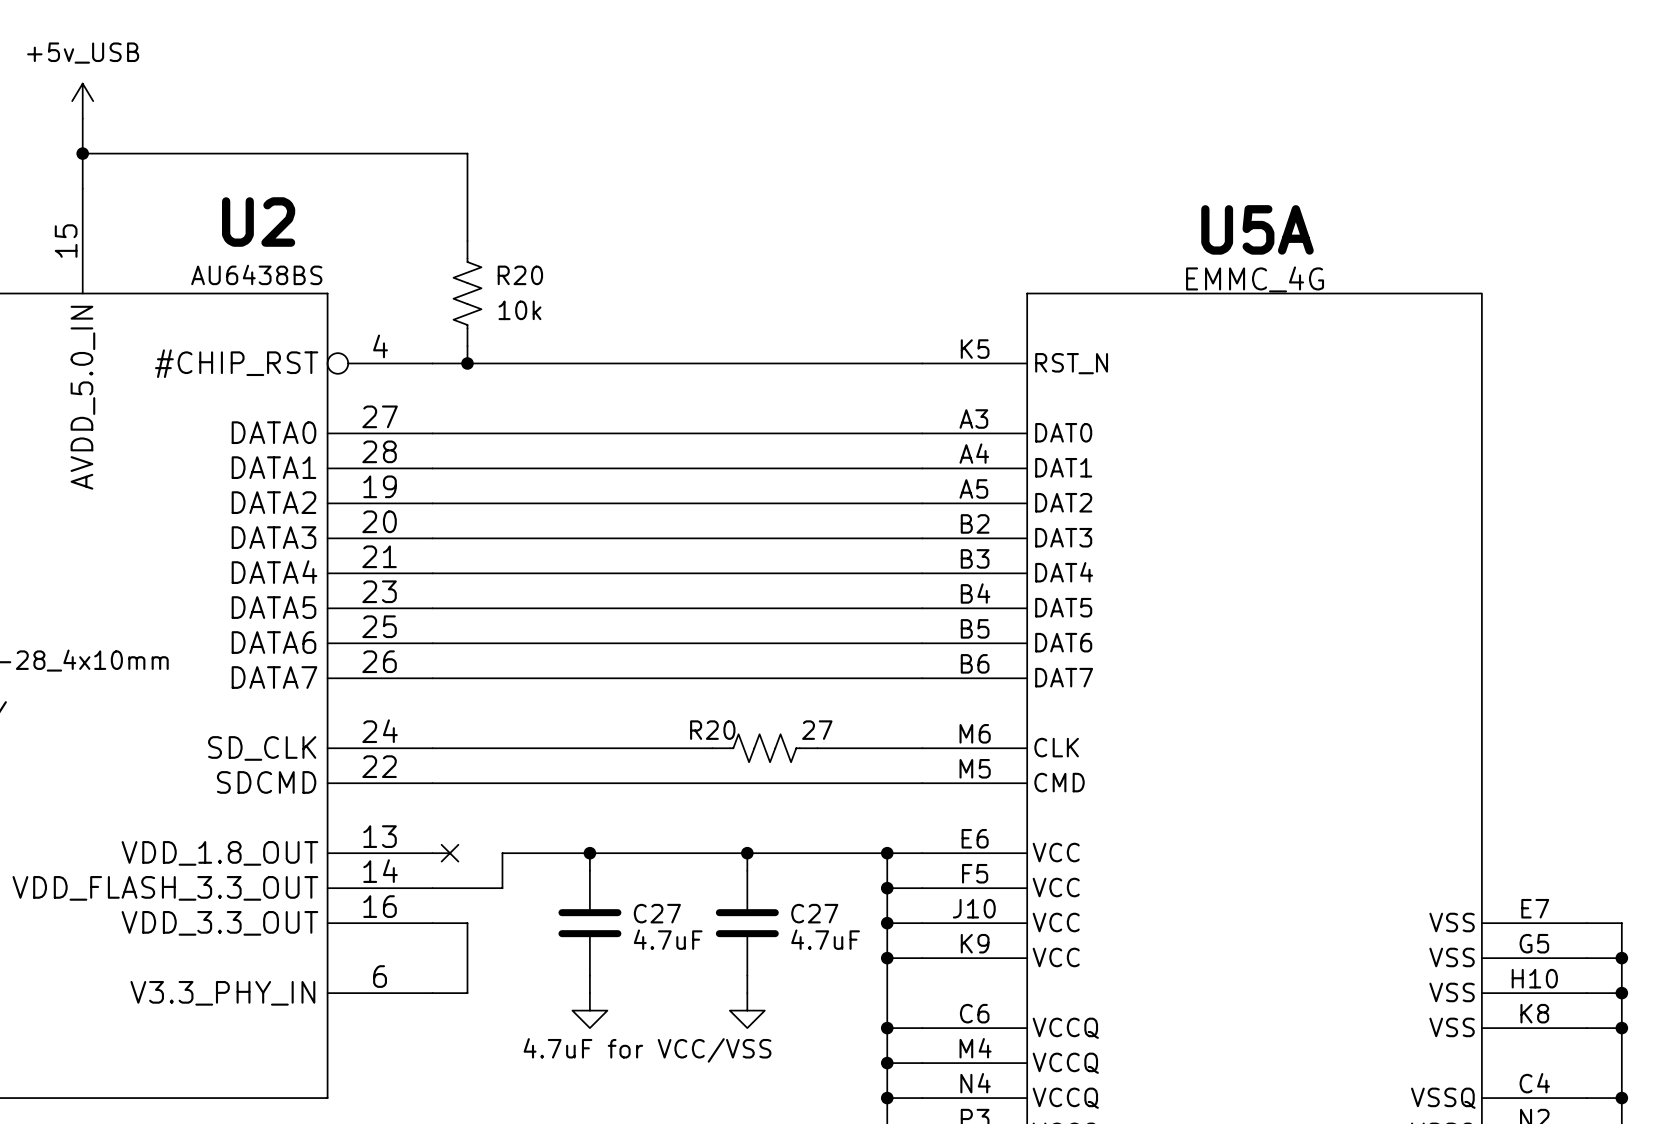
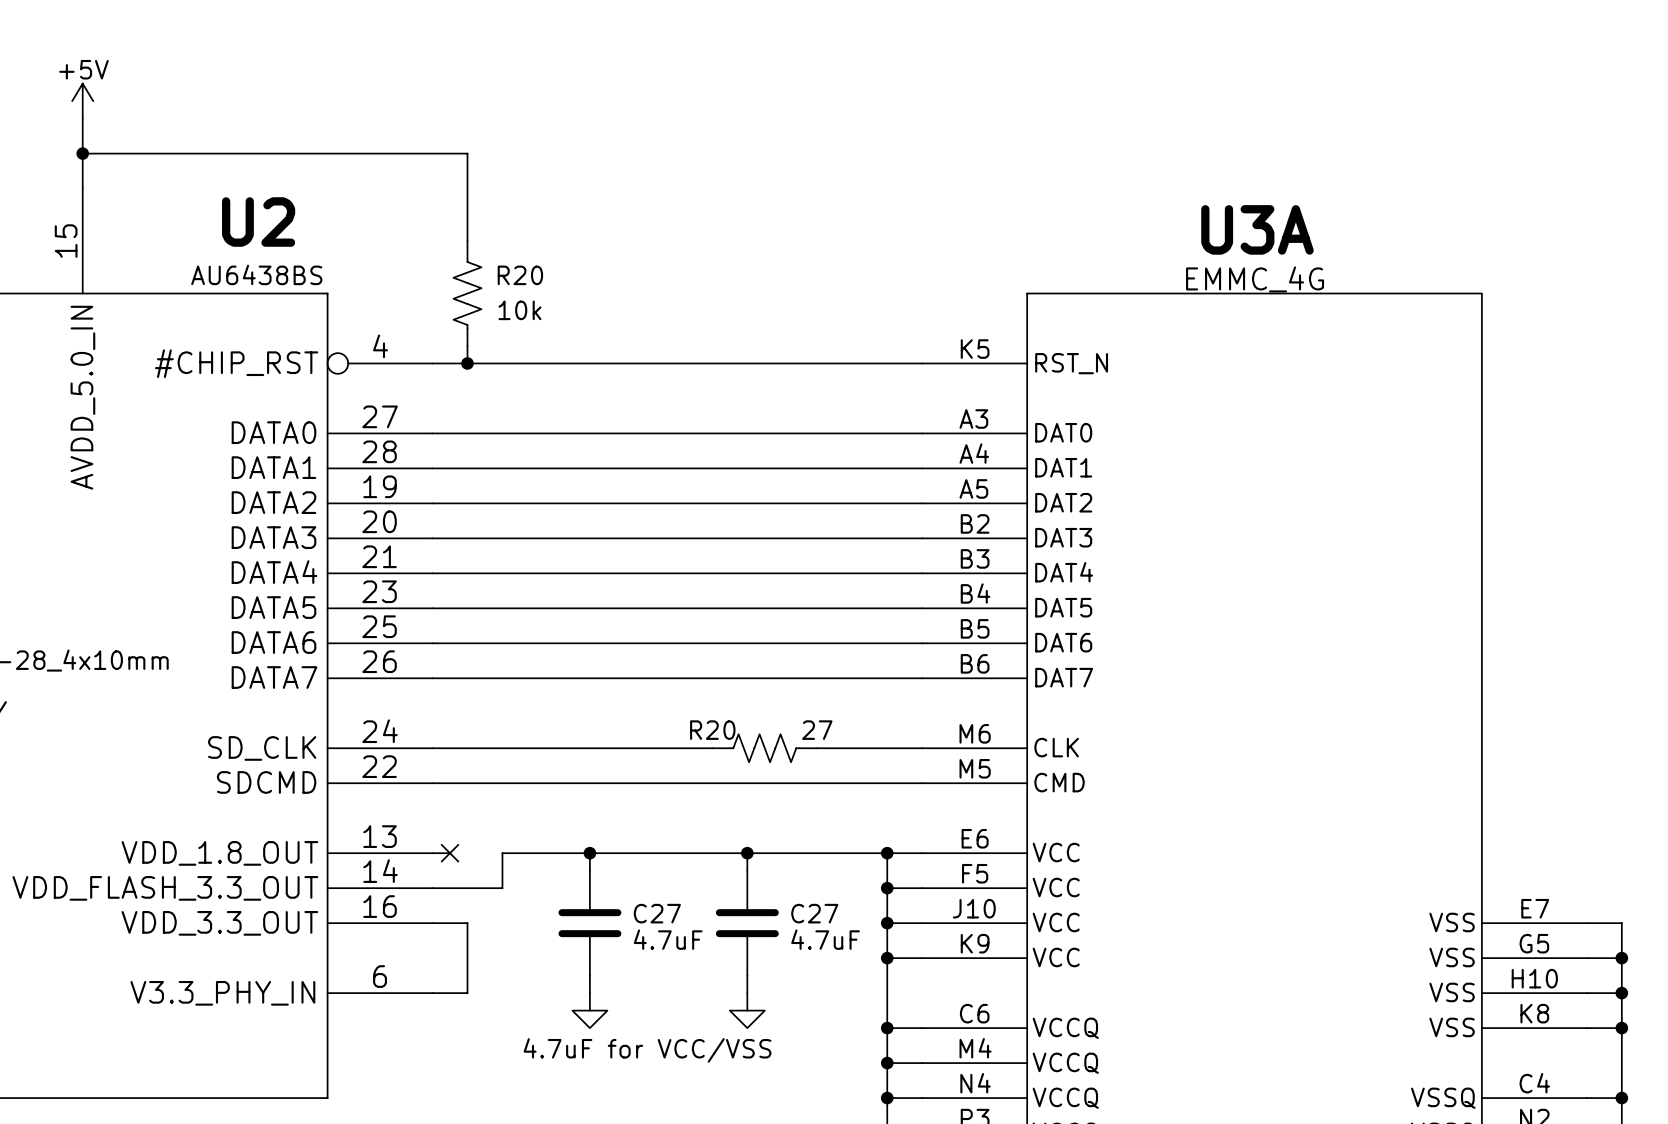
power symbol: +5v_USB (82, 101) -> +5V (82, 101)
U5A name: U5A (1257, 229) -> U3A (1257, 229)

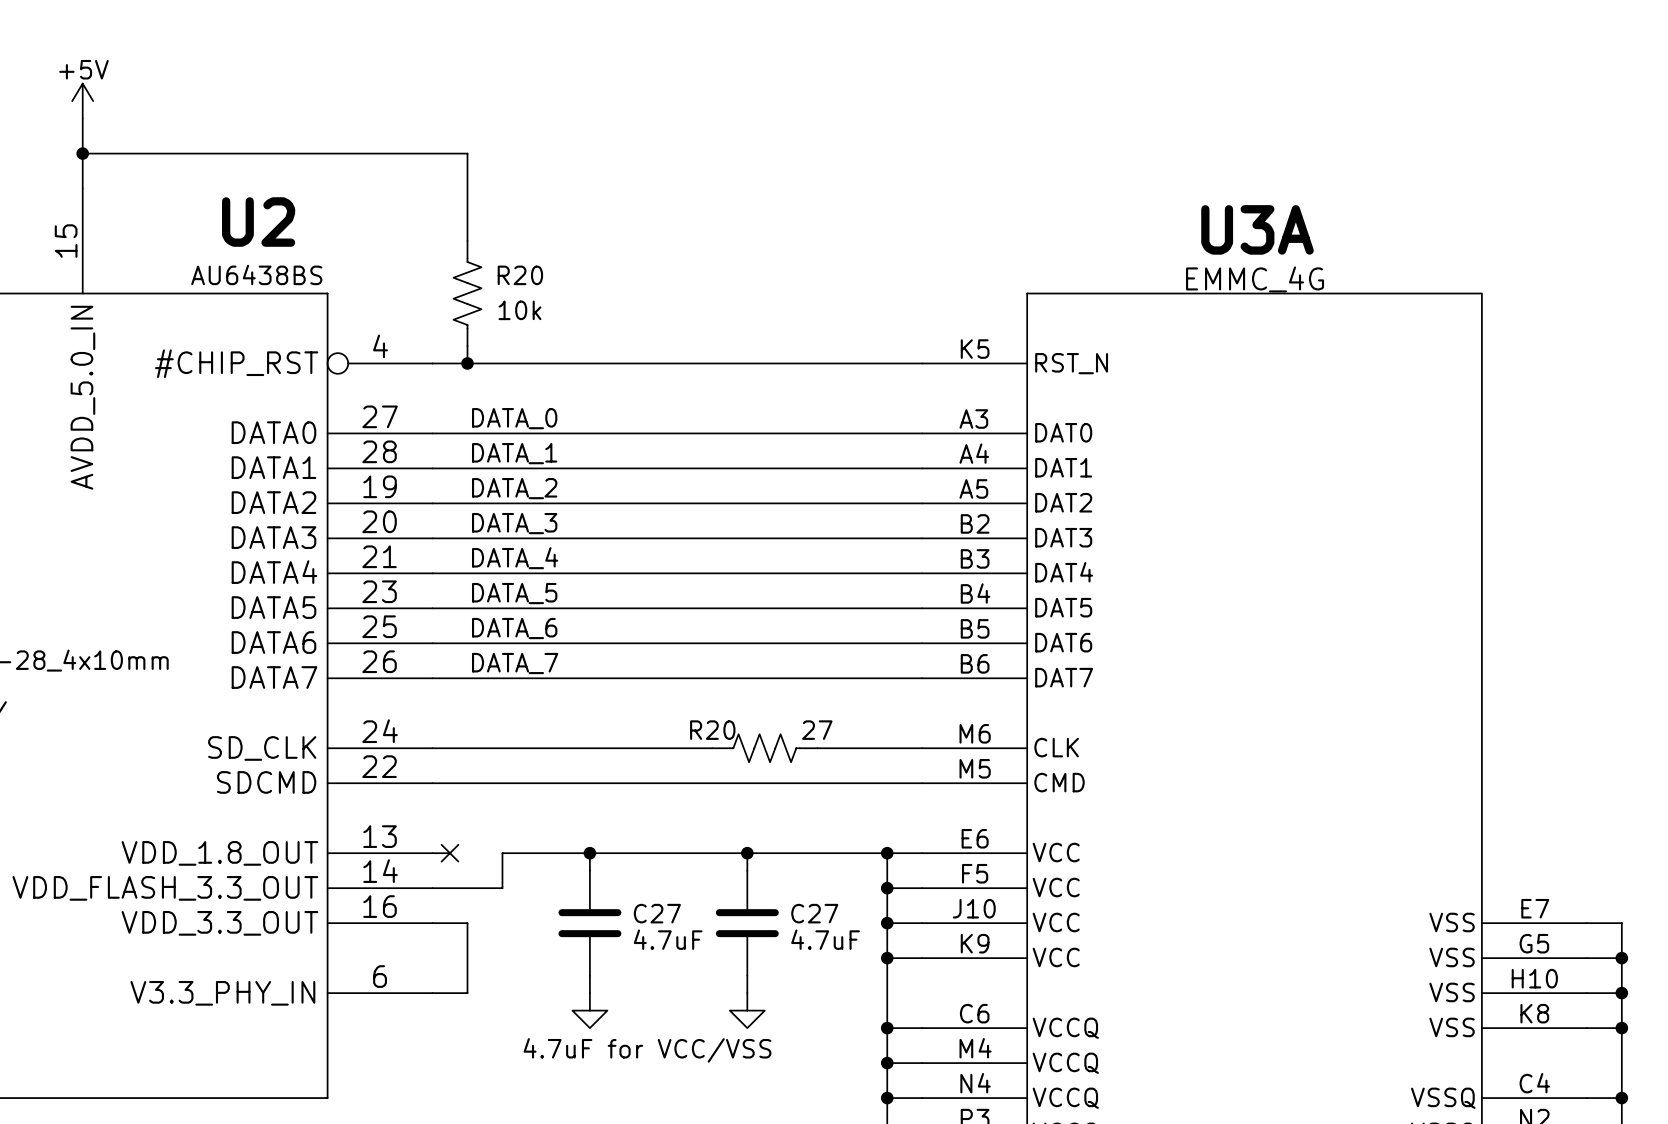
label: none -> DATA_0 (514, 418)
label: none -> DATA_1 (514, 453)
label: none -> DATA_2 (514, 488)
label: none -> DATA_3 (514, 523)
label: none -> DATA_4 (515, 558)
label: none -> DATA_5 (514, 593)
label: none -> DATA_6 (514, 628)
label: none -> DATA_7 (515, 663)

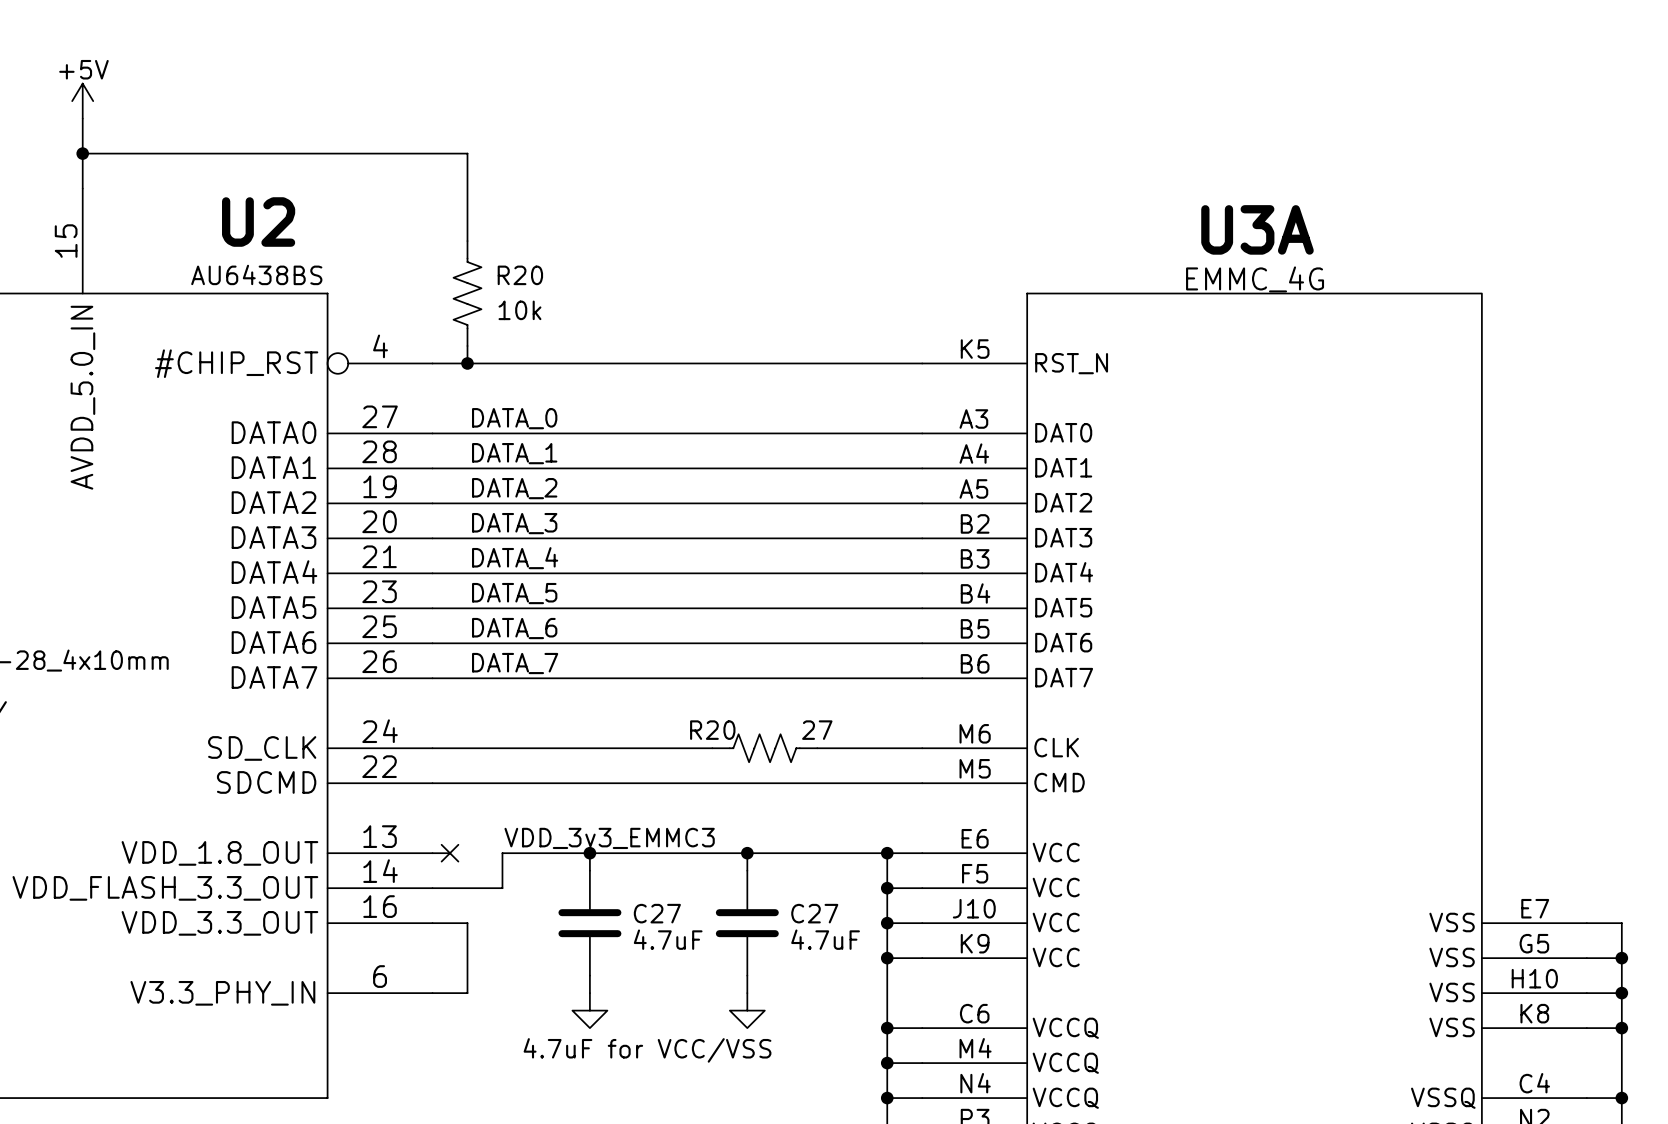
label: none -> VDD_3v3_EMMC3 (609, 838)

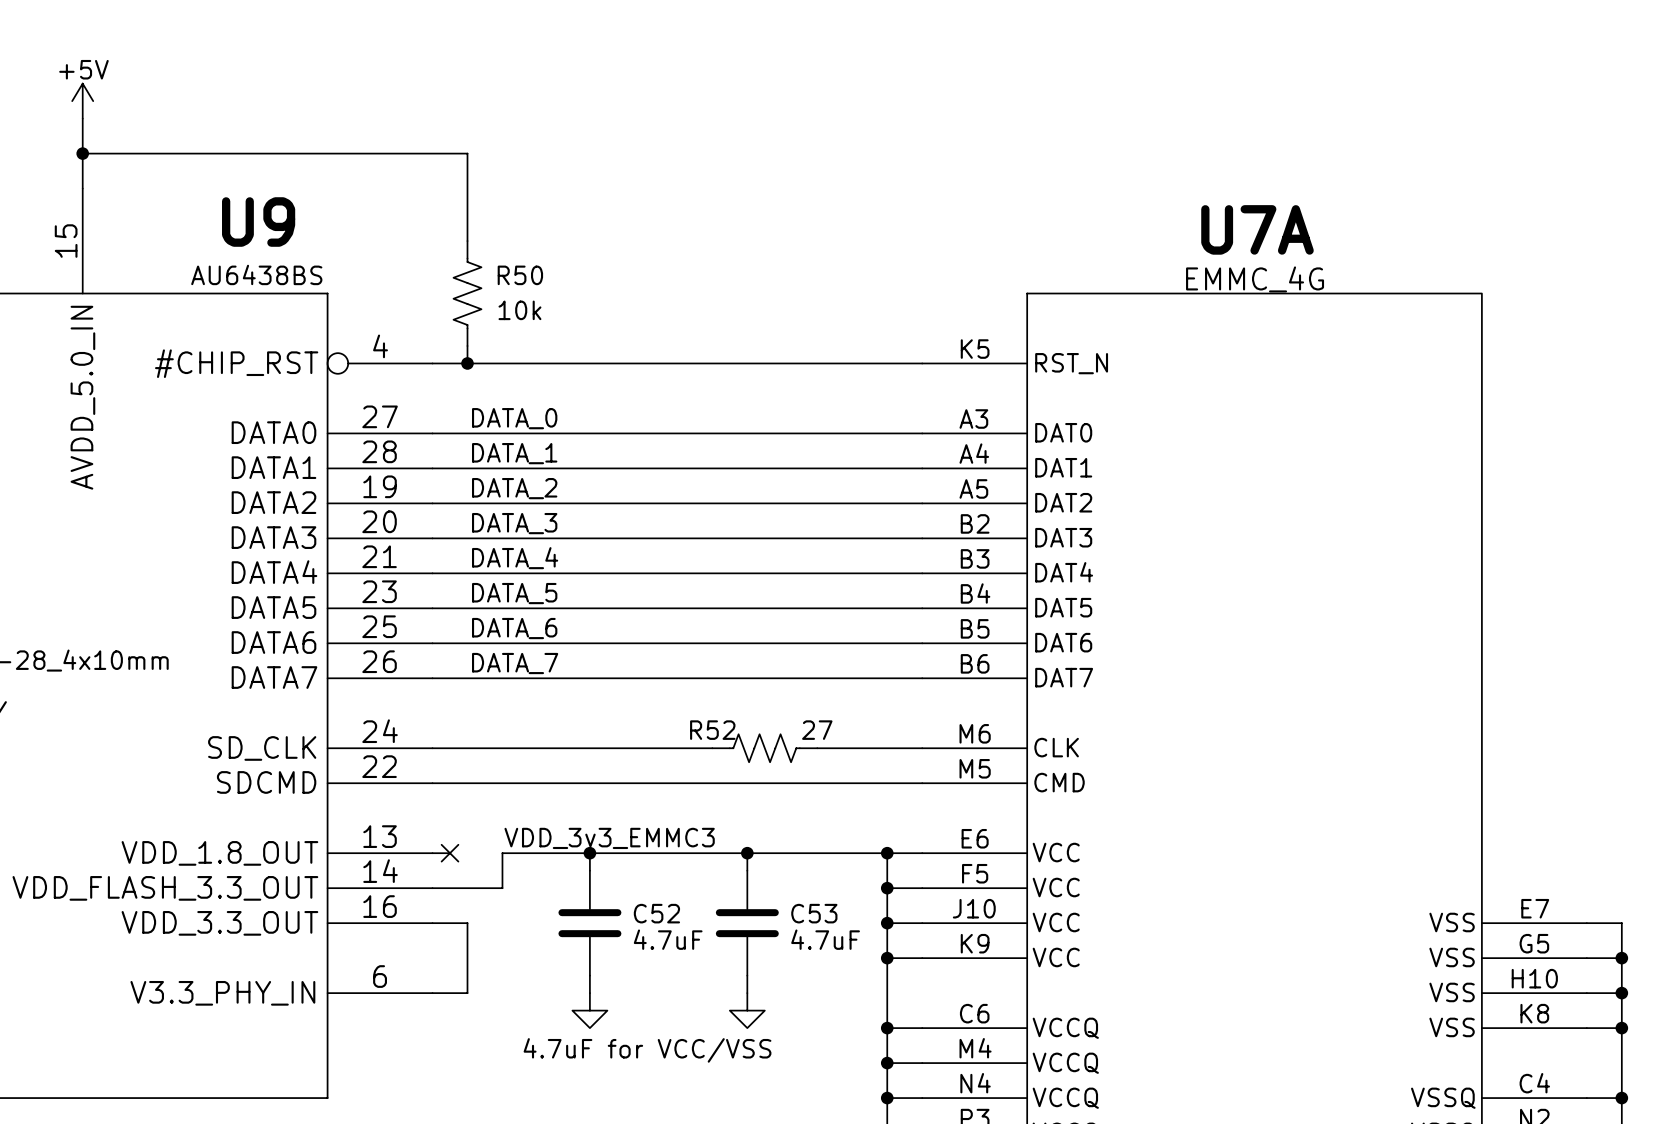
U2 name: U2 (258, 222) -> U9 (258, 222)
U3A name: U3A (1257, 229) -> U7A (1257, 229)
R20 name: R20 (520, 275) -> R50 (520, 275)
R20 name: R20 (712, 730) -> R52 (712, 730)
C27 name: C27 (657, 913) -> C52 (656, 913)
C27 name: C27 (814, 913) -> C53 (814, 913)

